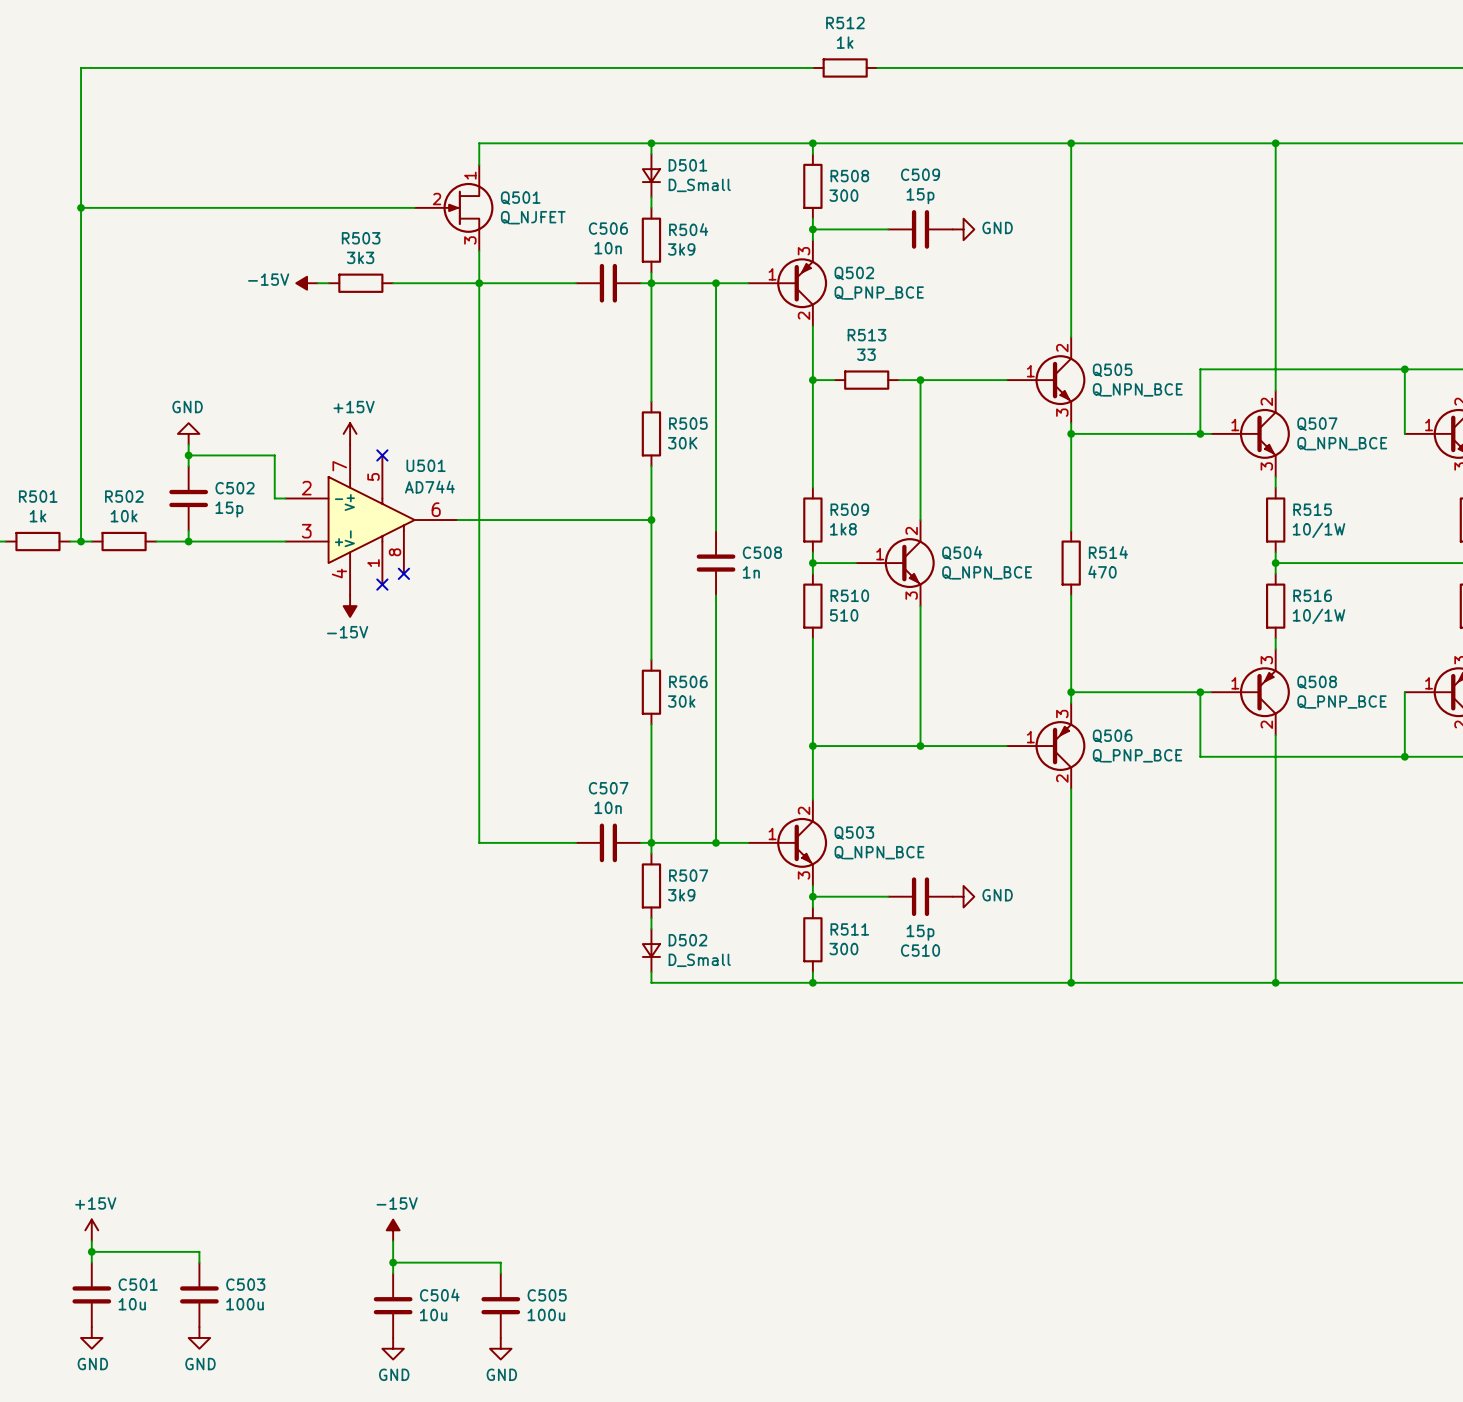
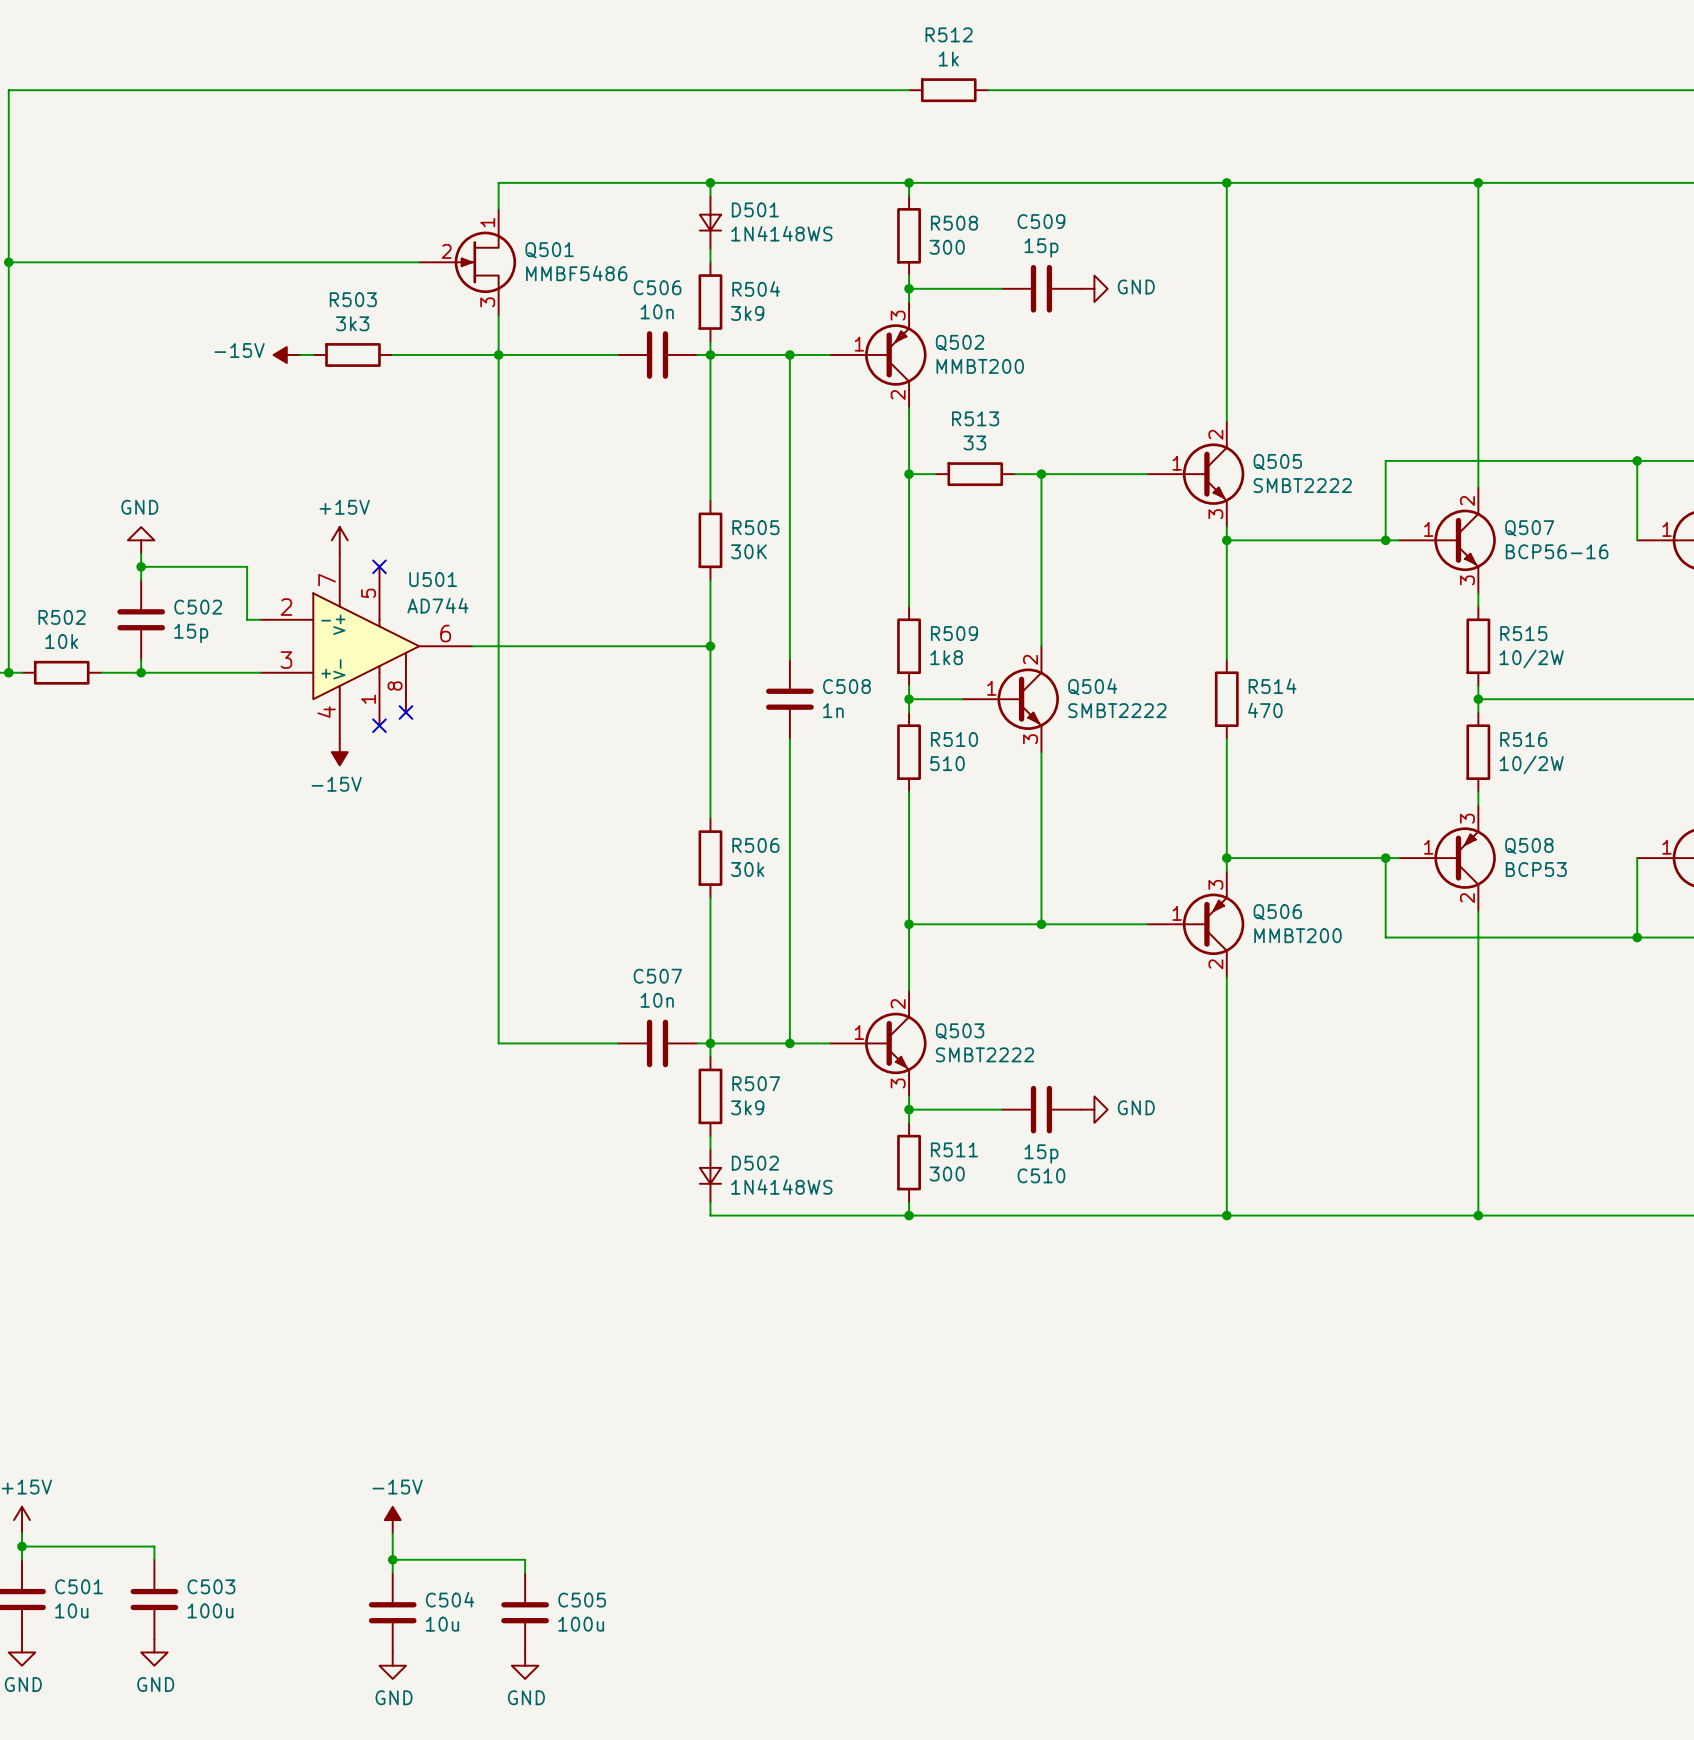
D501 value: D_Small (699, 185) -> 1N4148WS (781, 233)
Q501 value: Q_NJFET (533, 217) -> MMBF5486 (576, 273)
Q502 value: Q_PNP_BCE (879, 293) -> MMBT200 (980, 366)
Q505 value: Q_NPN_BCE (1137, 389) -> SMBT2222 (1302, 485)
Q507 value: Q_NPN_BCE (1342, 443) -> BCP56-16 (1557, 551)
R515 value: 10/1W (1319, 530) -> 10/2W (1531, 658)
Q504 value: Q_NPN_BCE (987, 572) -> SMBT2222 (1117, 710)
R516 value: 10/1W (1319, 616) -> 10/2W (1531, 764)
Q508 value: Q_PNP_BCE (1341, 702) -> BCP53 (1536, 869)
Q506 value: Q_PNP_BCE (1137, 755) -> MMBT200 (1297, 935)
Q503 value: Q_NPN_BCE (879, 852) -> SMBT2222 (984, 1054)
D502 value: D_Small (699, 960) -> 1N4148WS (781, 1186)

